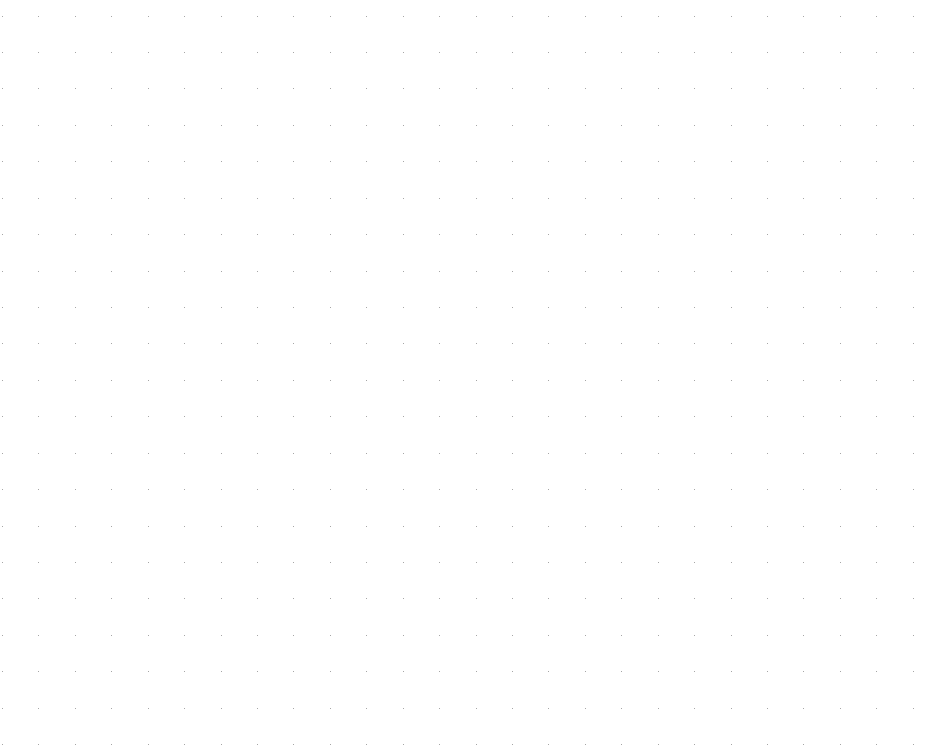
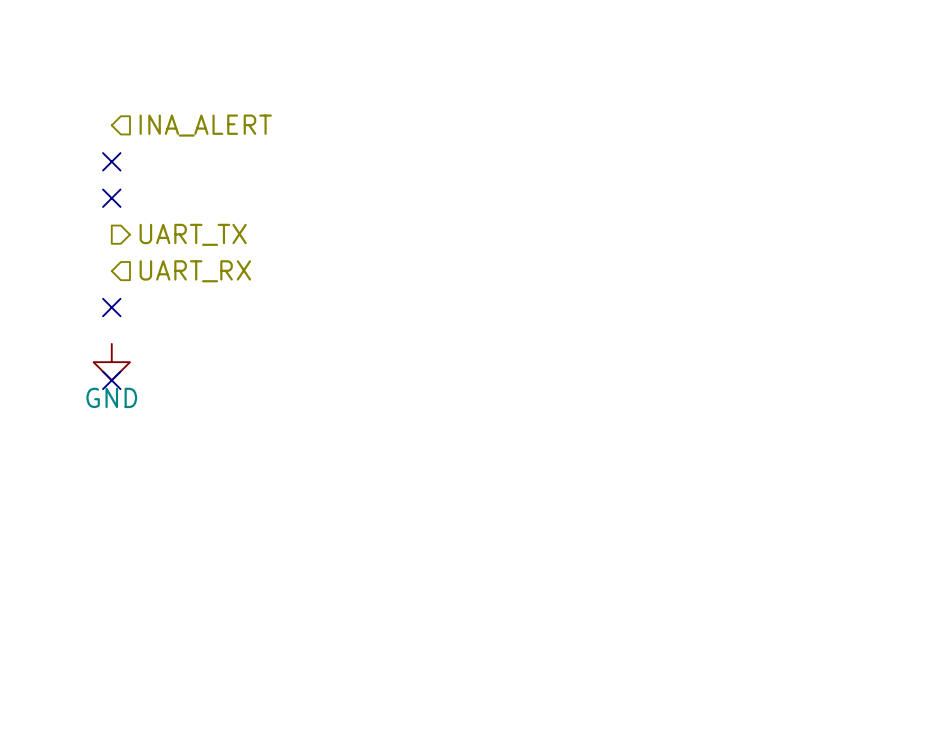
hierarchical label: none -> INA_ALERT (205, 125)
no-connect mark: none -> (111, 161)
no-connect mark: none -> (111, 198)
hierarchical label: none -> UART_TX (193, 234)
hierarchical label: none -> UART_RX (195, 271)
no-connect mark: none -> (111, 307)
power symbol: none -> GND (111, 362)
no-connect mark: none -> (111, 380)

